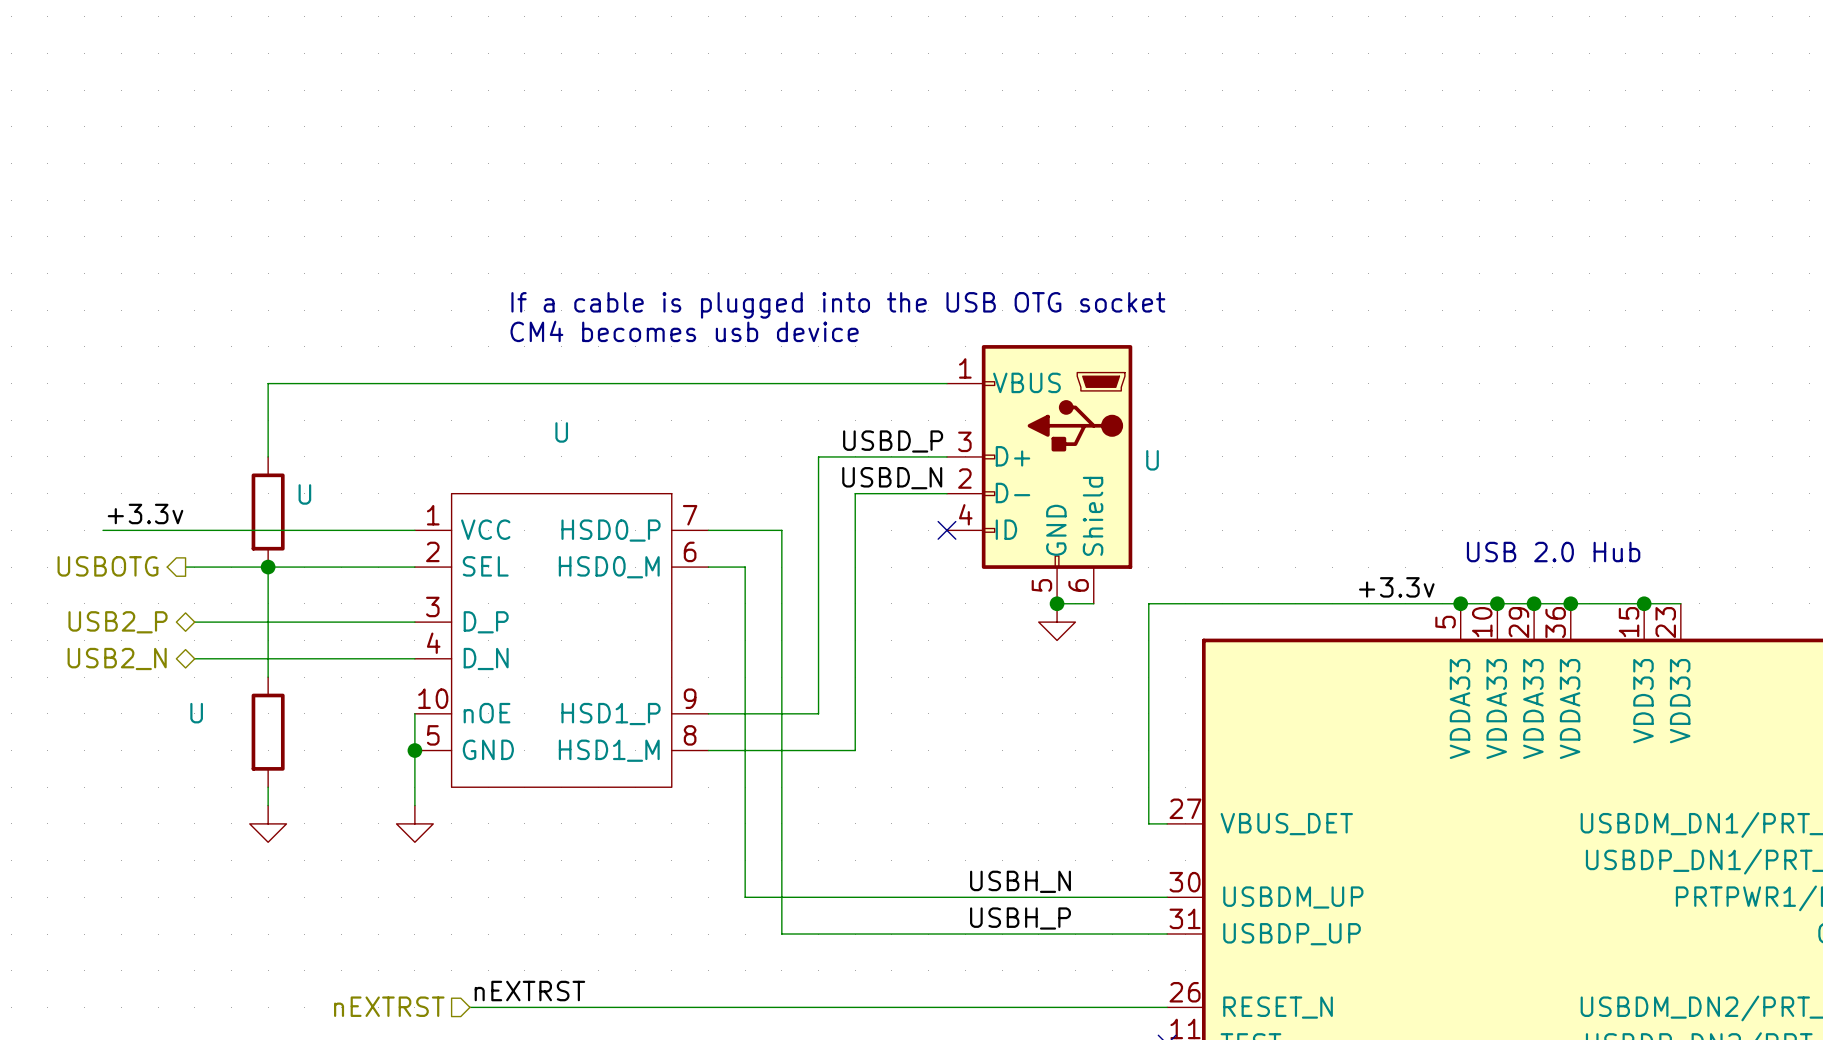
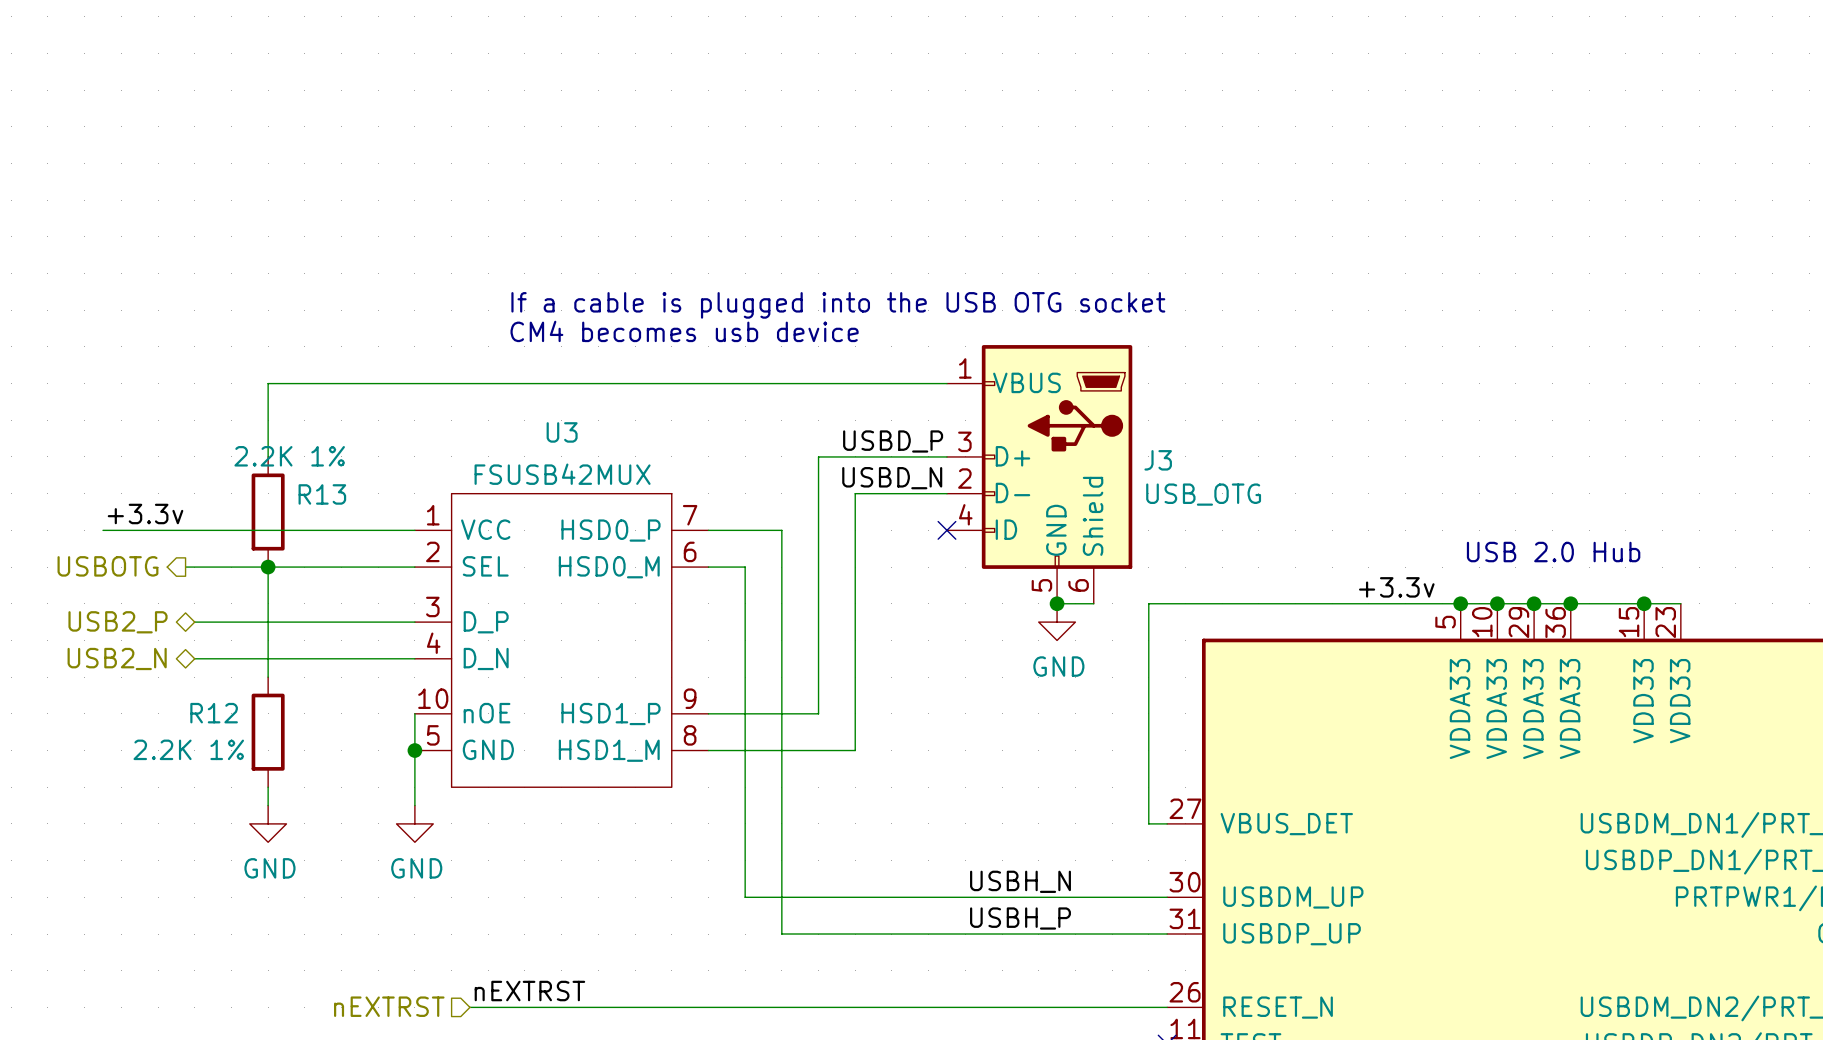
U name: U (561, 432) -> U3 (562, 432)
U value: none -> 2.2K 1% (289, 456)
U name: U (1152, 460) -> J3 (1158, 460)
U value: none -> FSUSB42MUX (562, 474)
U name: U (304, 494) -> R13 (322, 494)
U value: none -> USB_OTG (1203, 494)
power symbol text: none -> GND (1058, 666)
U name: U (196, 713) -> R12 (214, 713)
U value: none -> 2.2K 1% (188, 749)
power symbol text: none -> GND (269, 868)
power symbol text: none -> GND (416, 868)

